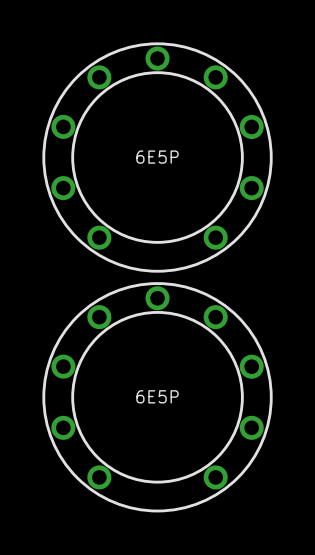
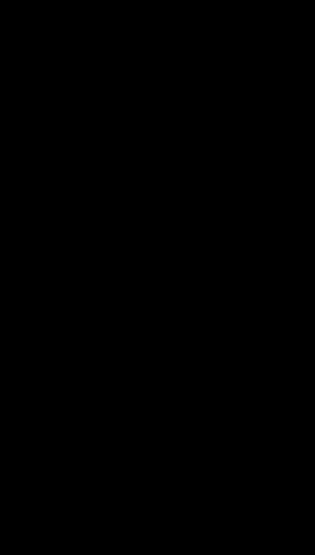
part: 6E5P (157, 157) -> none
part: 6E5P (157, 397) -> none

